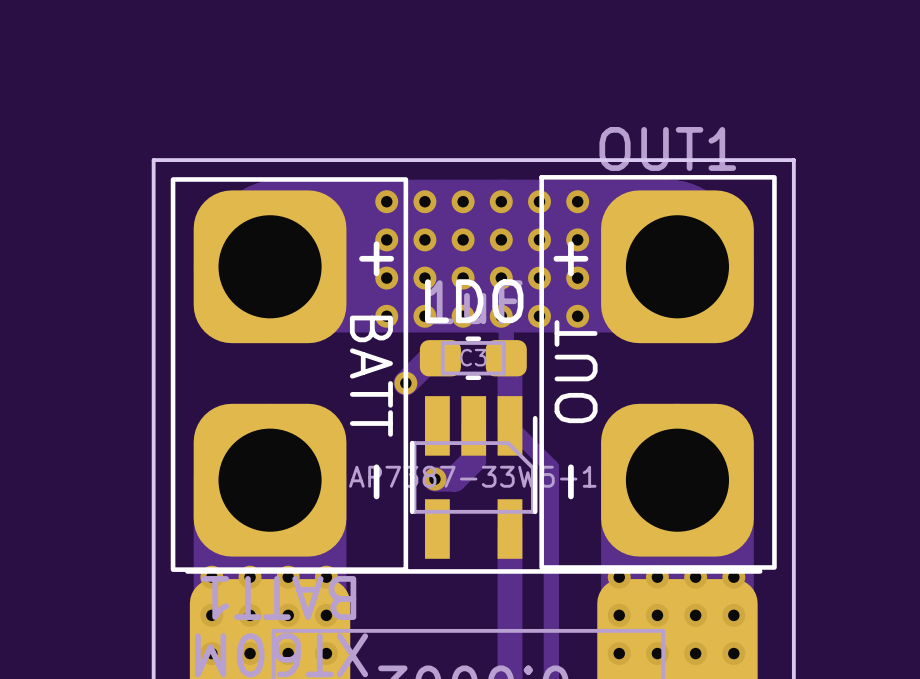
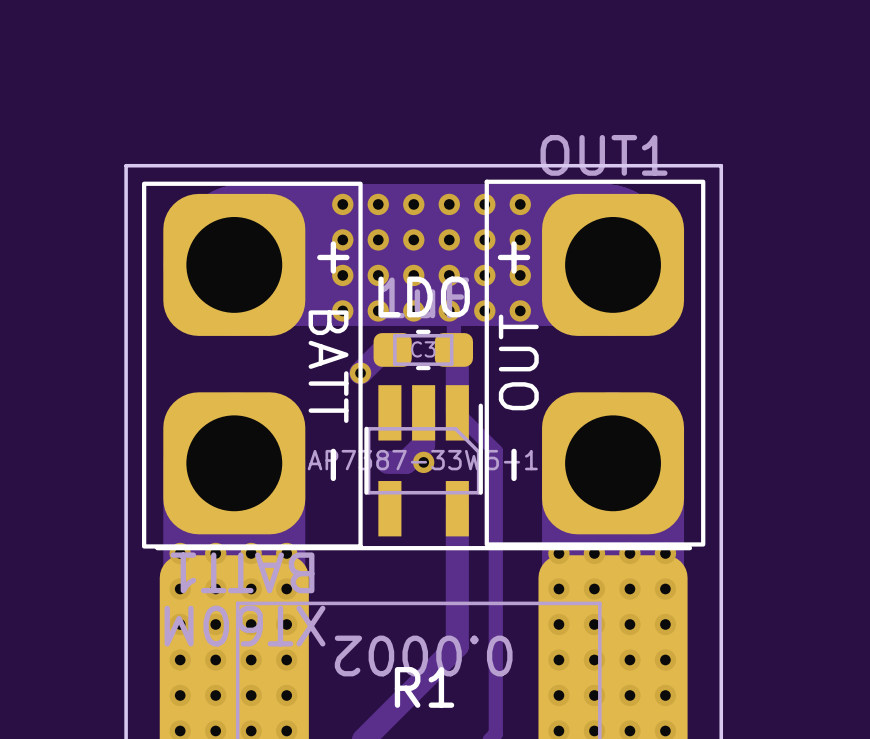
via position: (434, 479) -> (423, 462)

